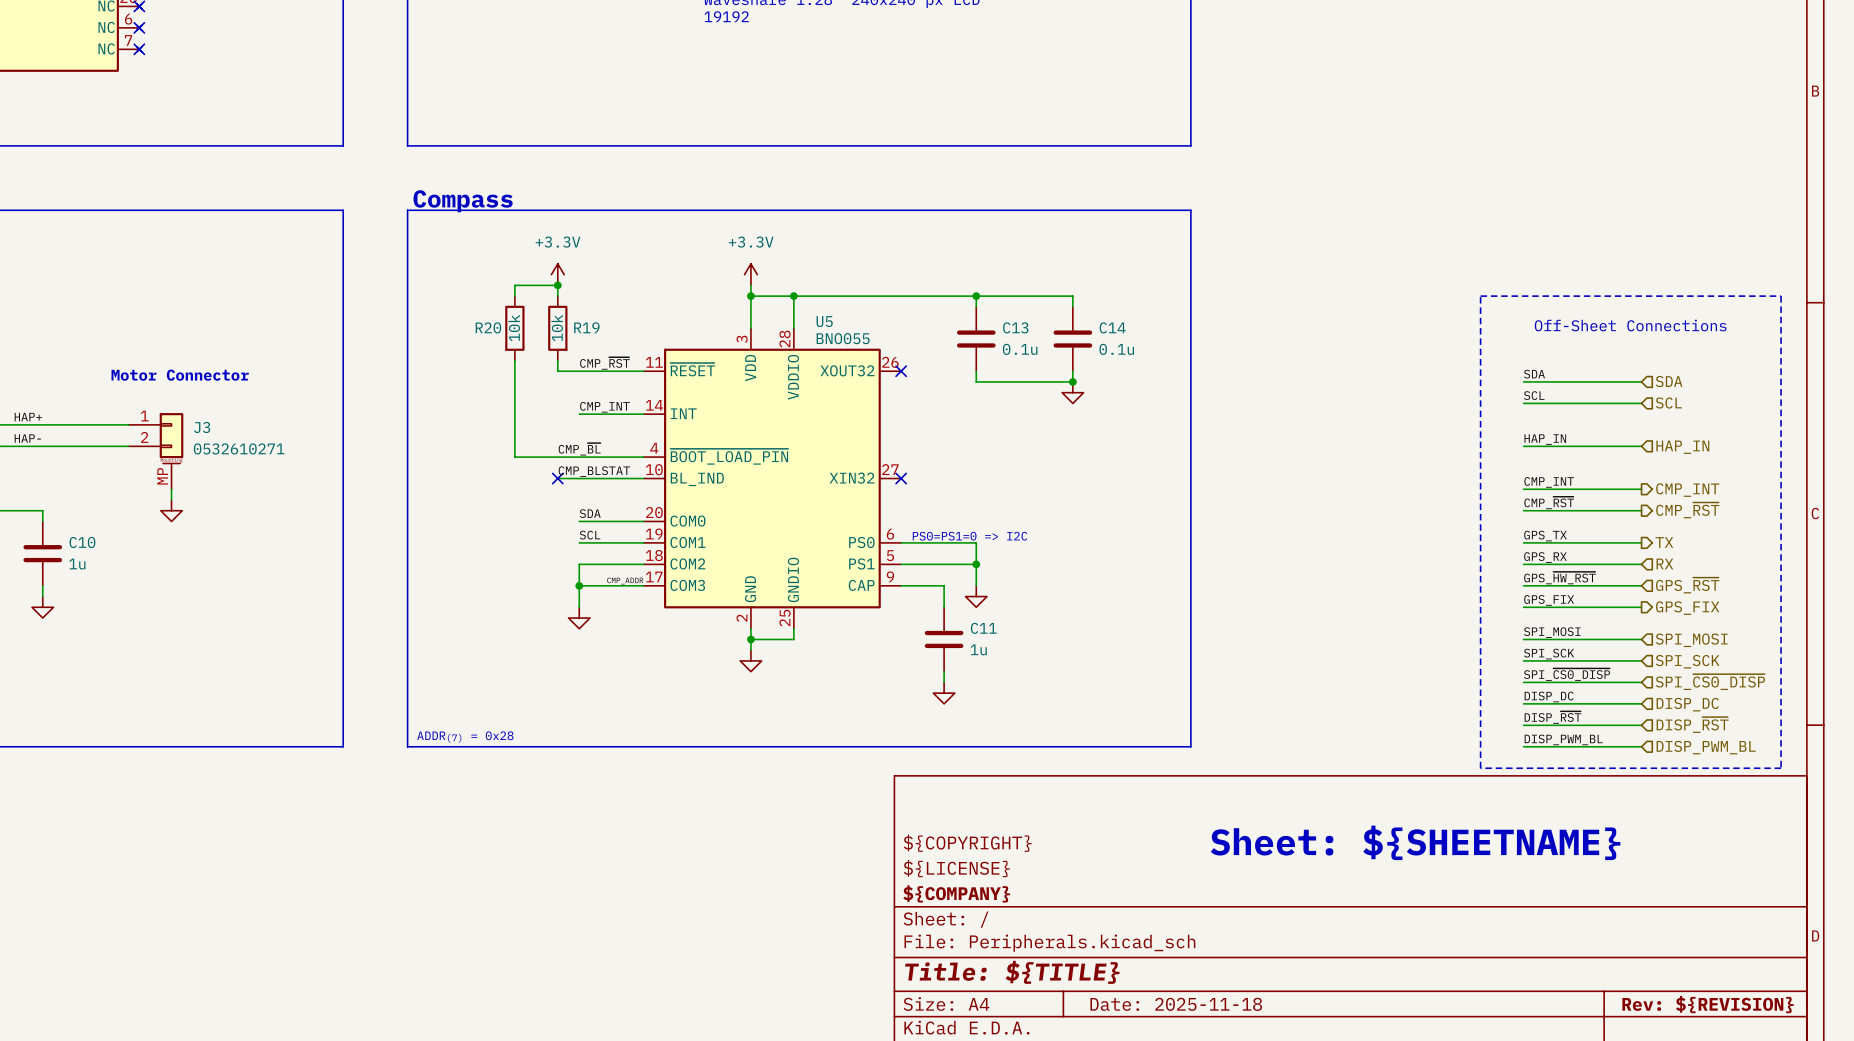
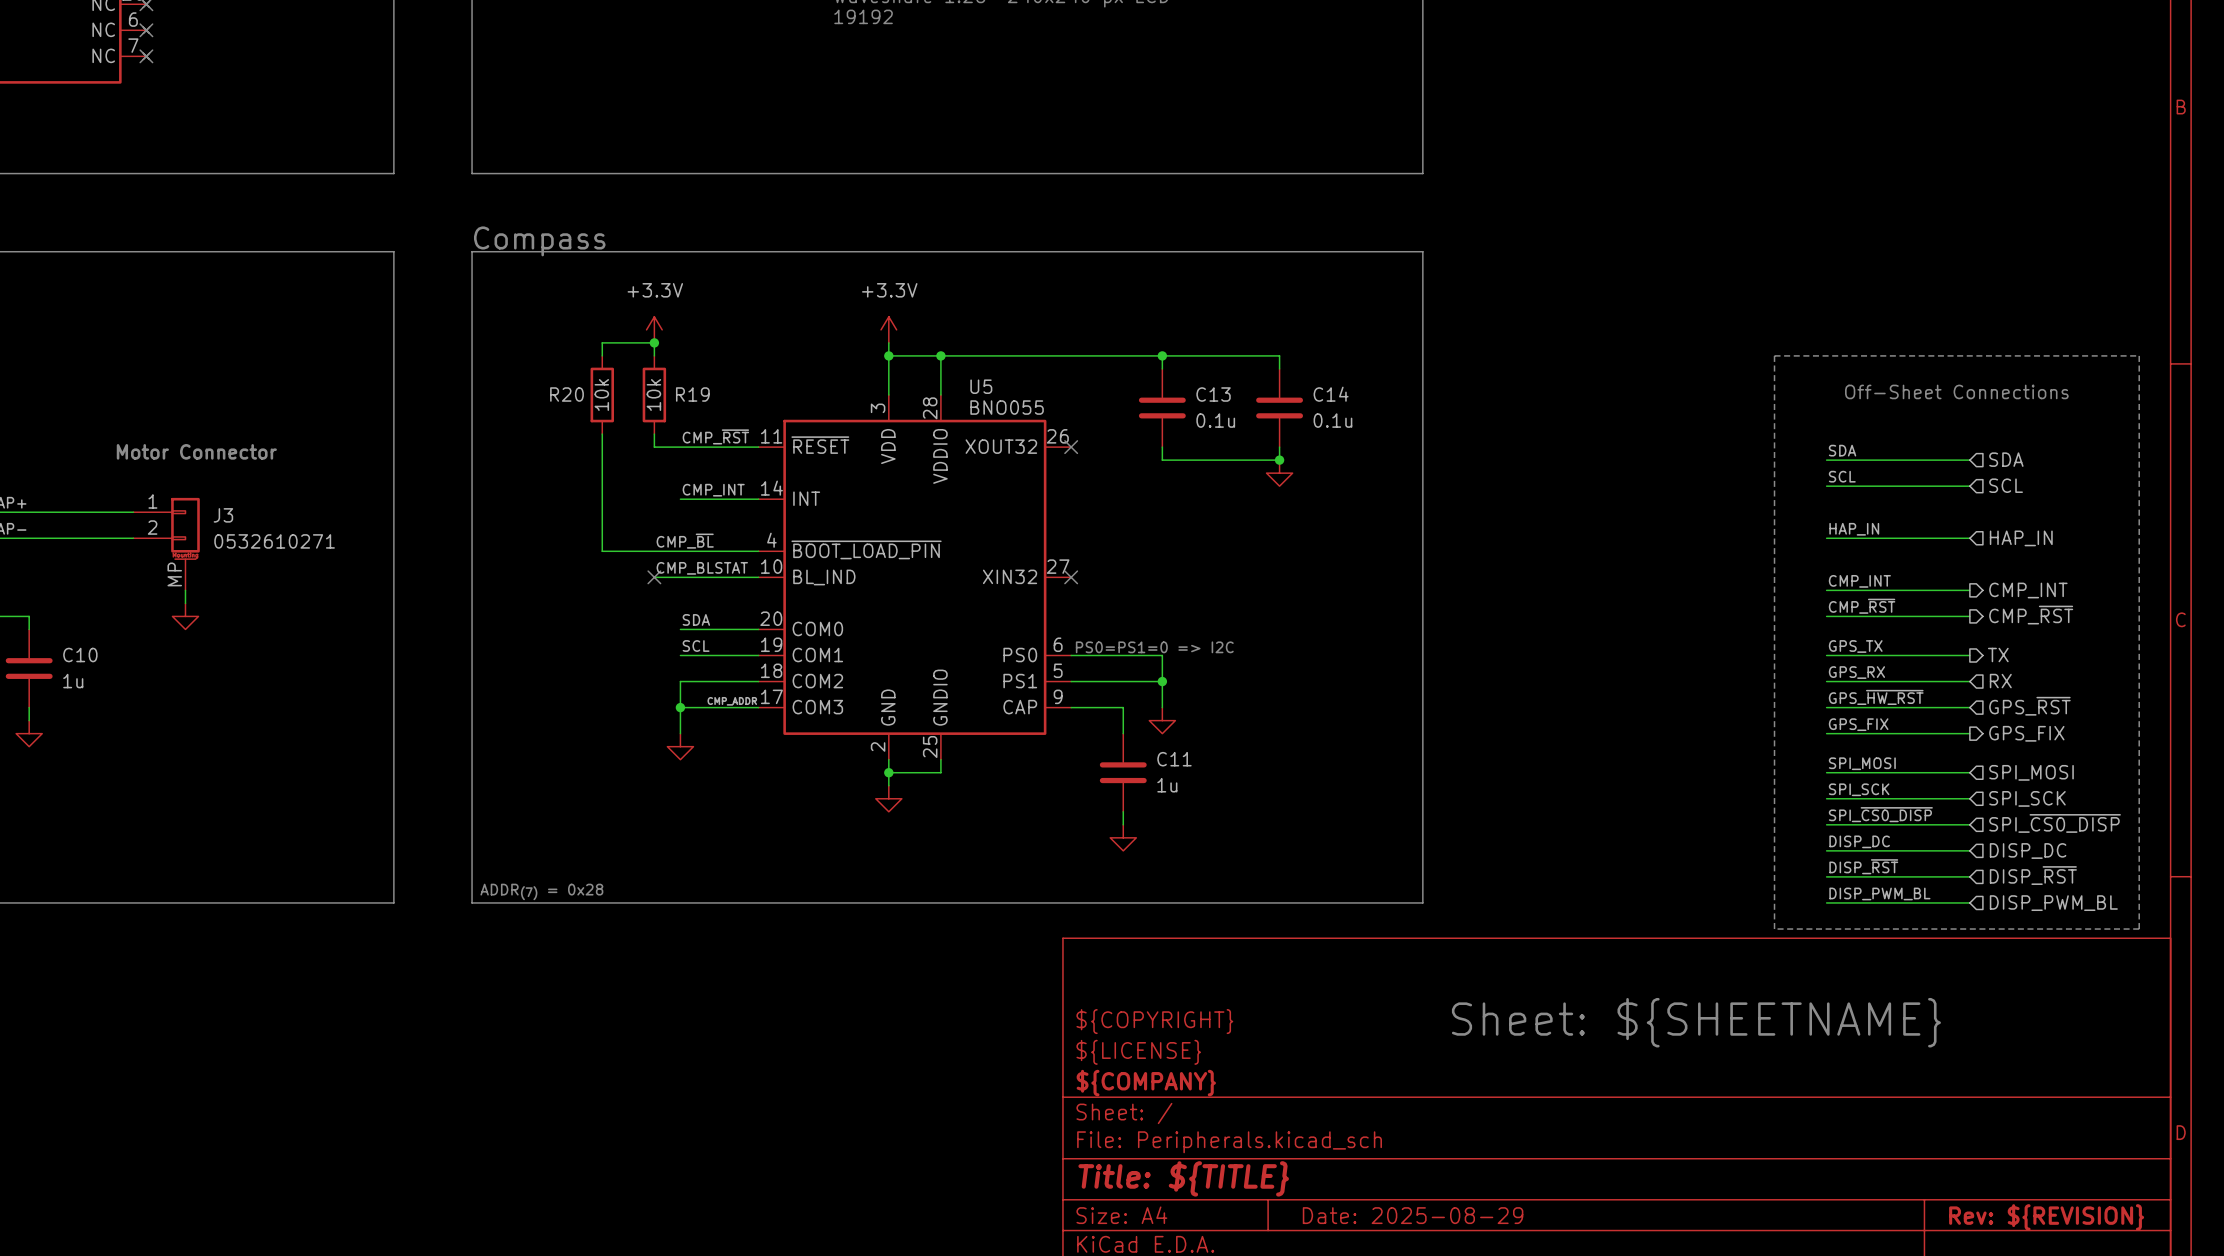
title block: Date: 2025-11-18 (1176, 1004) -> Date: 2025-08-29 (1413, 1215)

